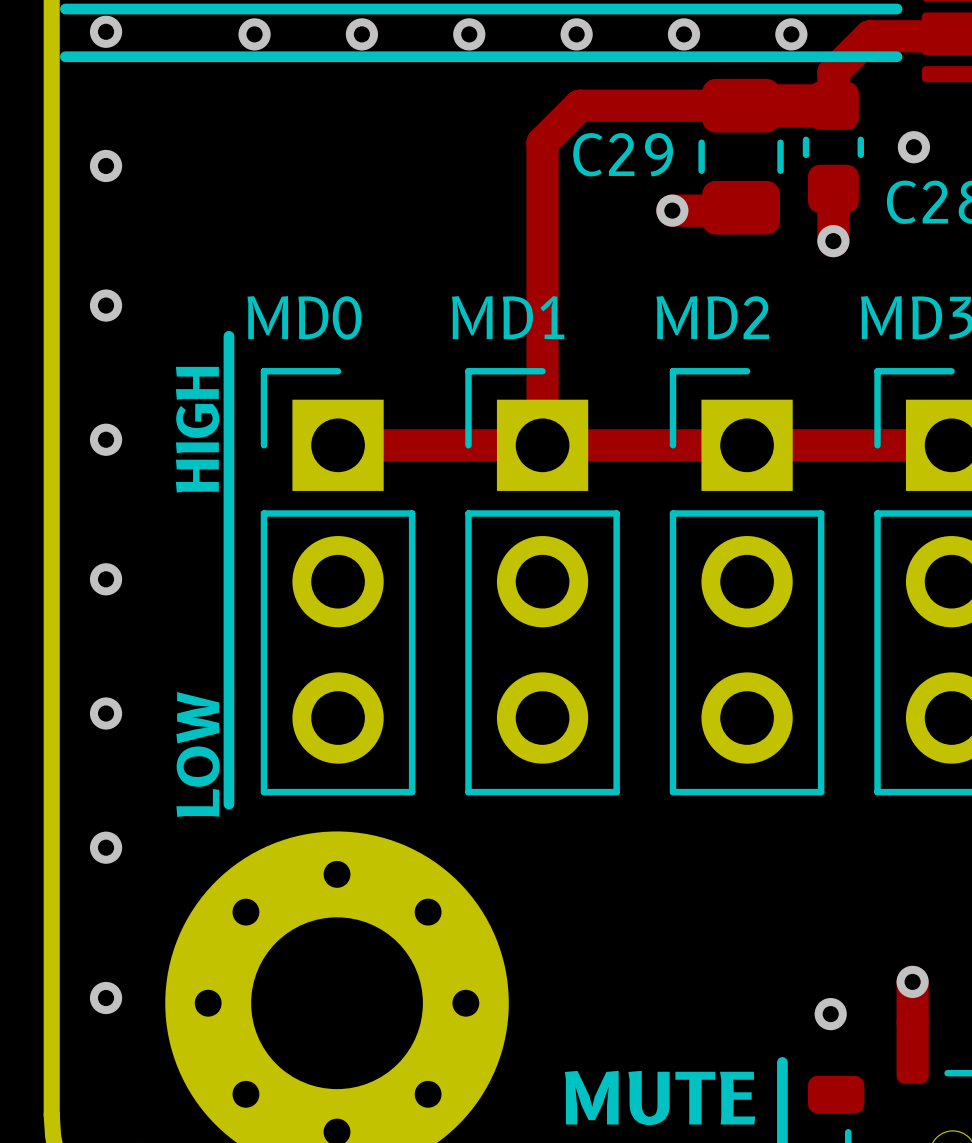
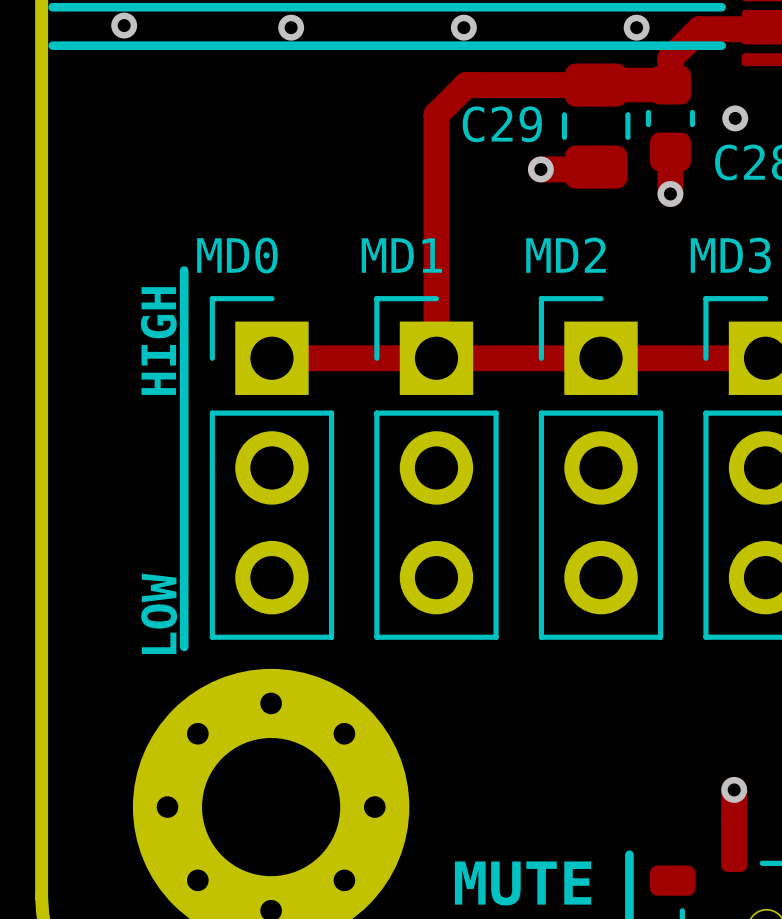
via position: (106, 31) -> (124, 25)
via: (254, 34) -> none
via: (469, 34) -> none
via: (684, 34) -> none
via: (106, 165) -> none
via: (106, 305) -> none
via: (106, 439) -> none
via: (106, 579) -> none
via: (106, 713) -> none
via: (106, 847) -> none
via: (106, 998) -> none
via: (830, 1014) -> none

